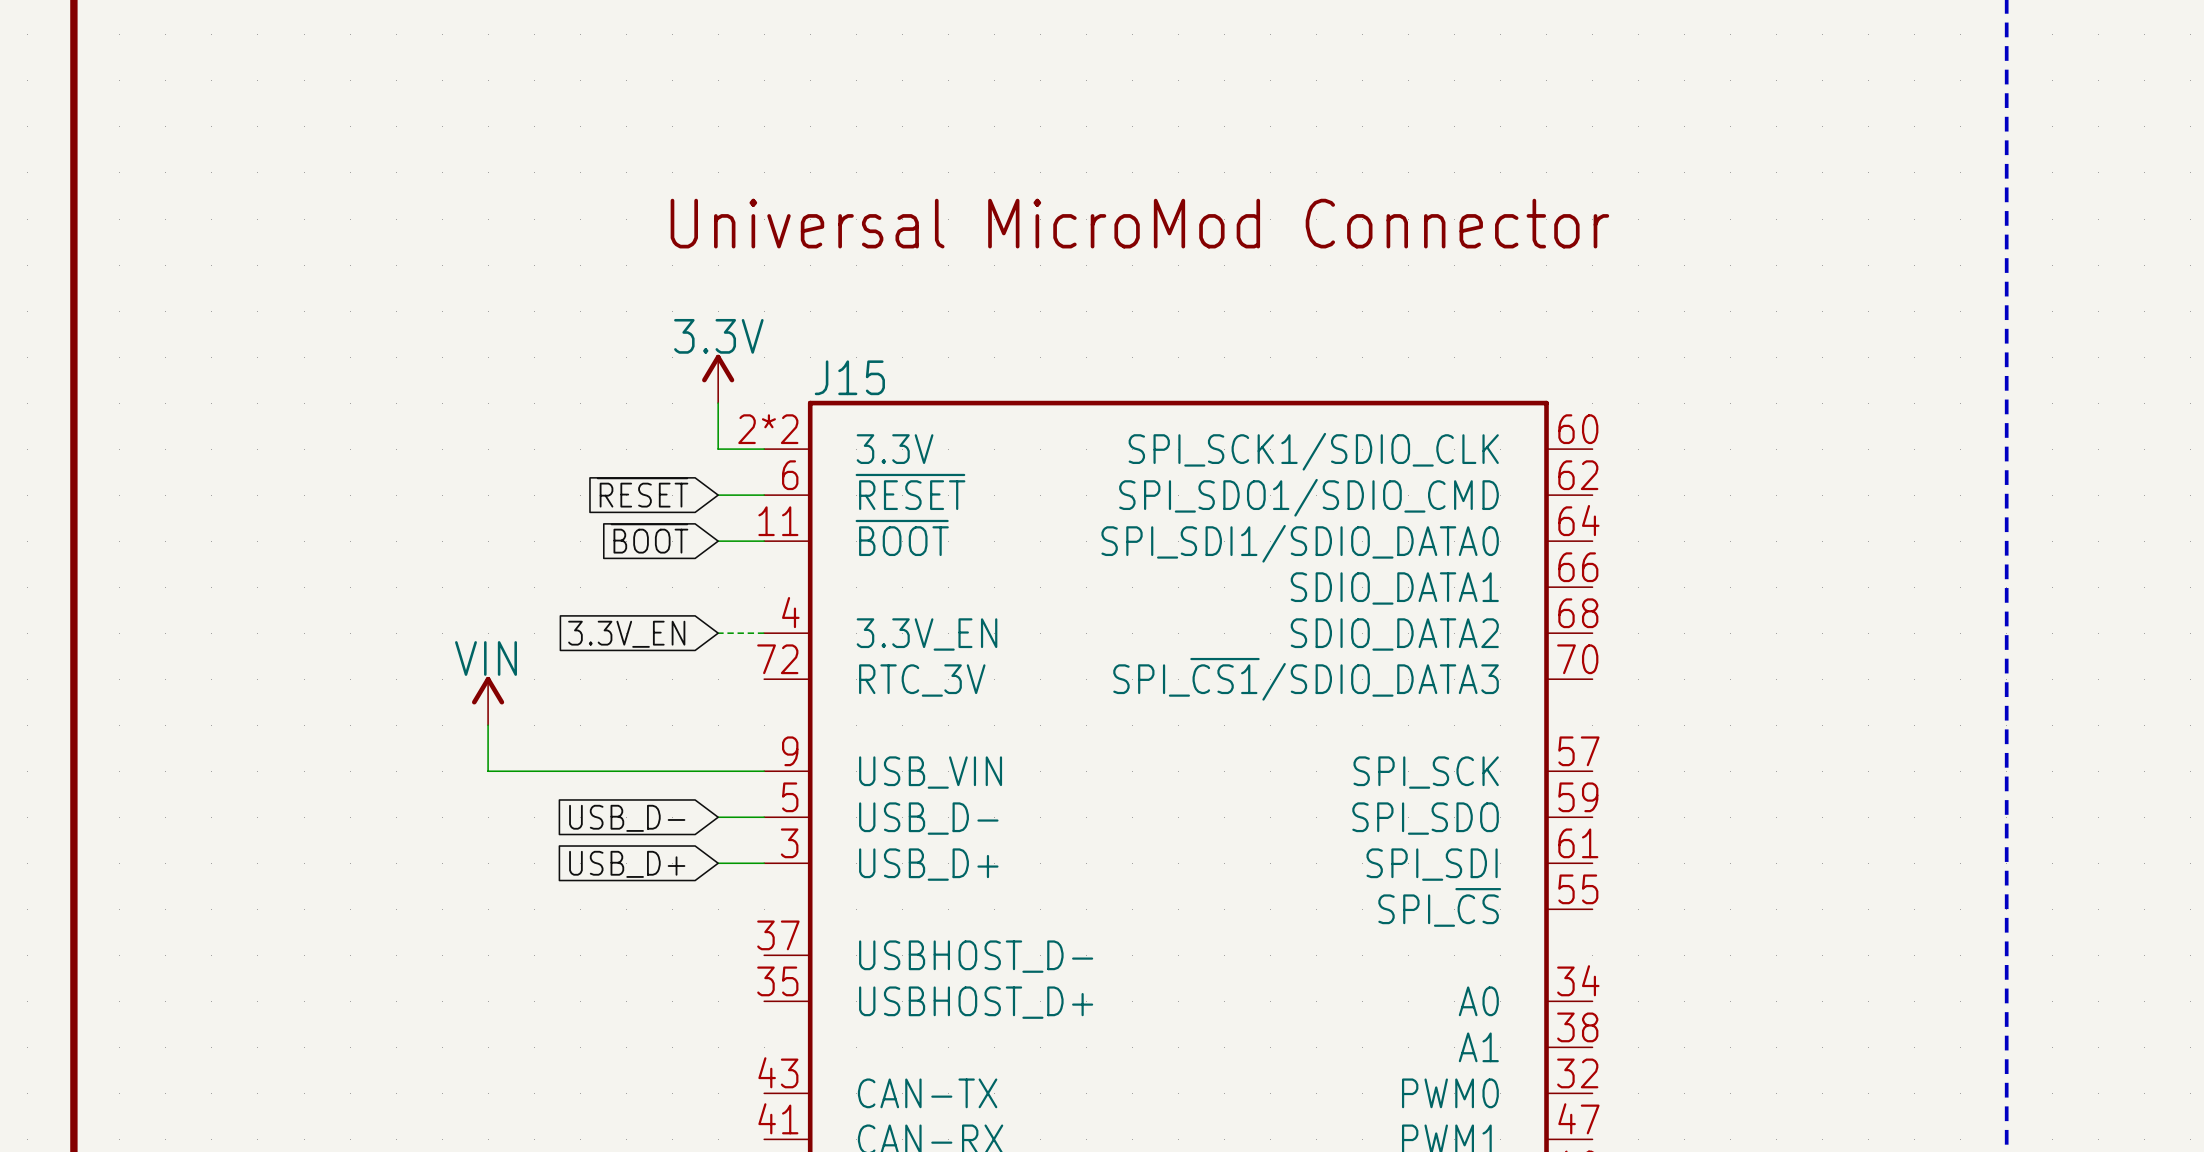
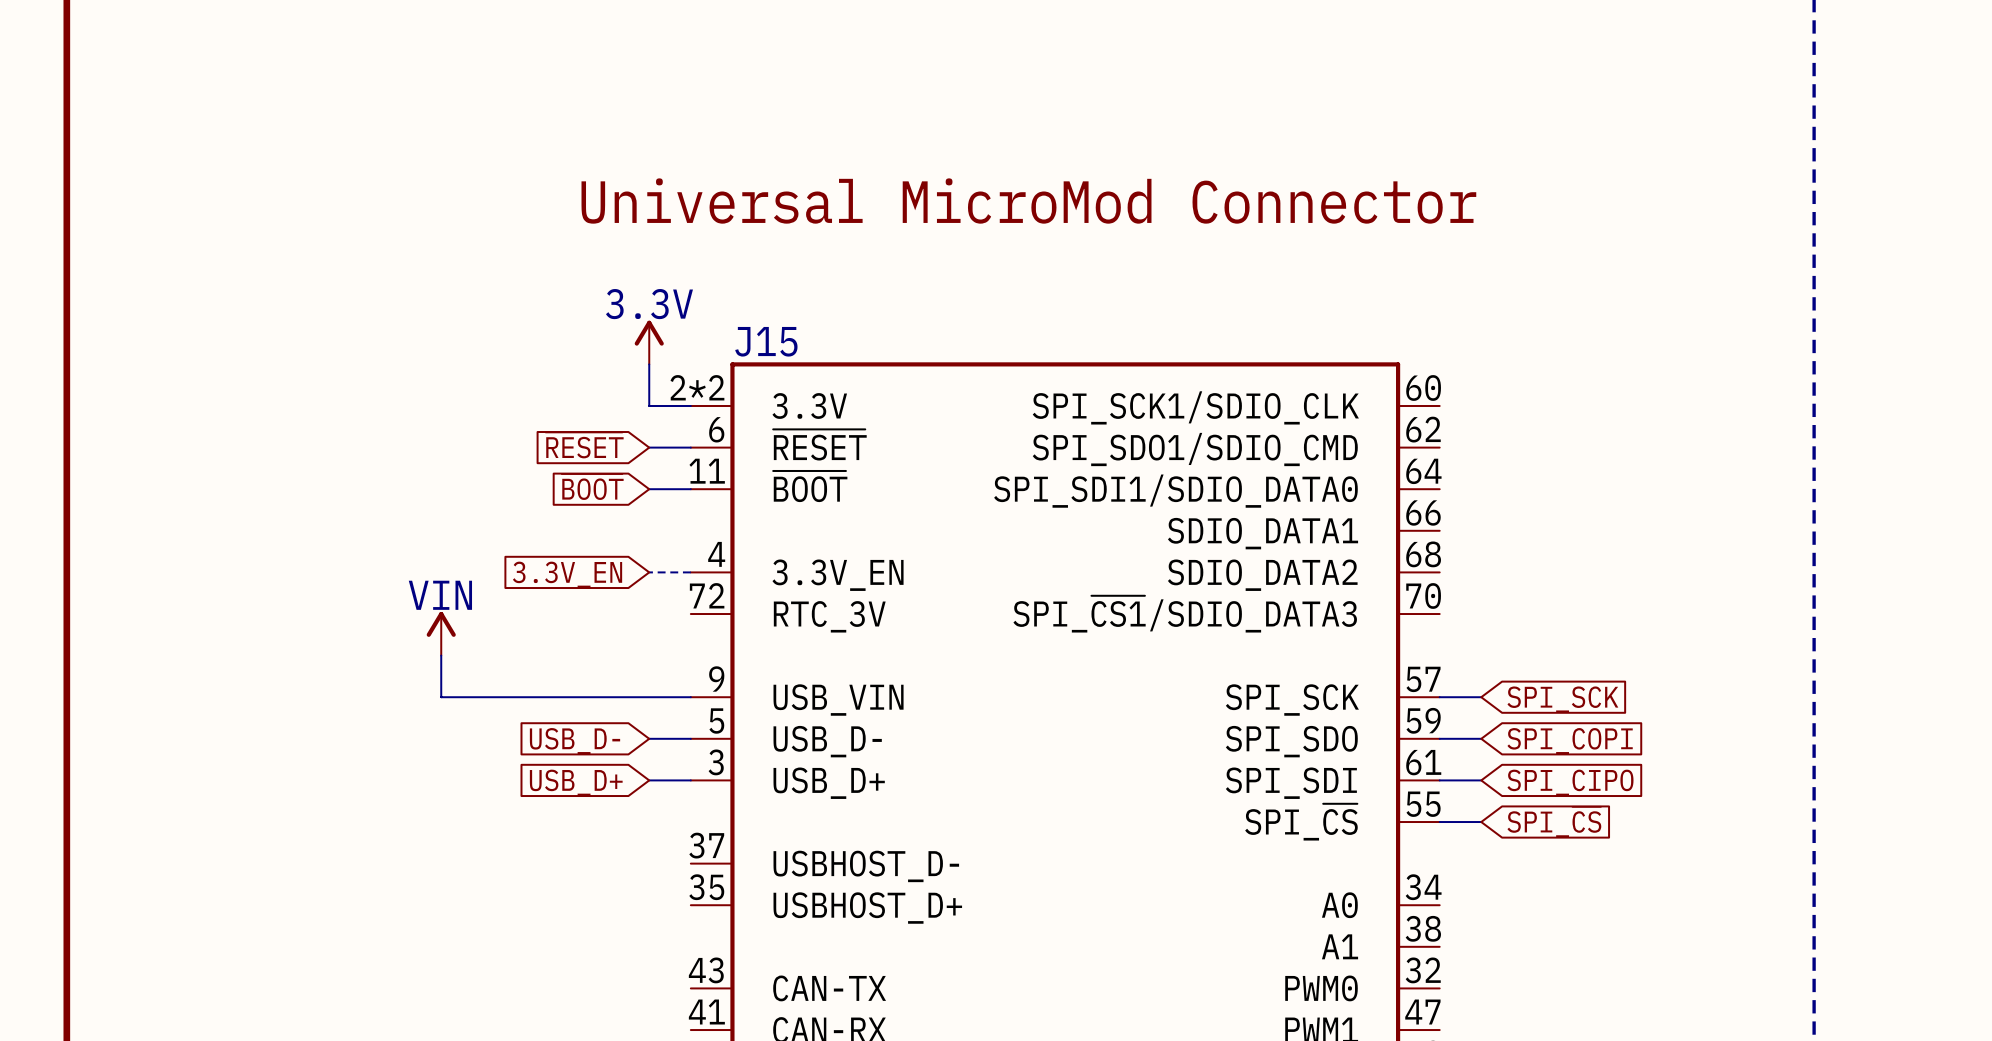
wire: none -> (1439, 697) (1481, 697)
global label: none -> SPI_SCK (1562, 699)
wire: none -> (1439, 738) (1481, 738)
global label: none -> SPI_COPI (1570, 741)
wire: none -> (1439, 780) (1481, 780)
global label: none -> SPI_CIPO (1570, 782)
global label: none -> SPI_~{CS} (1554, 822)
wire: none -> (1439, 822) (1481, 822)

